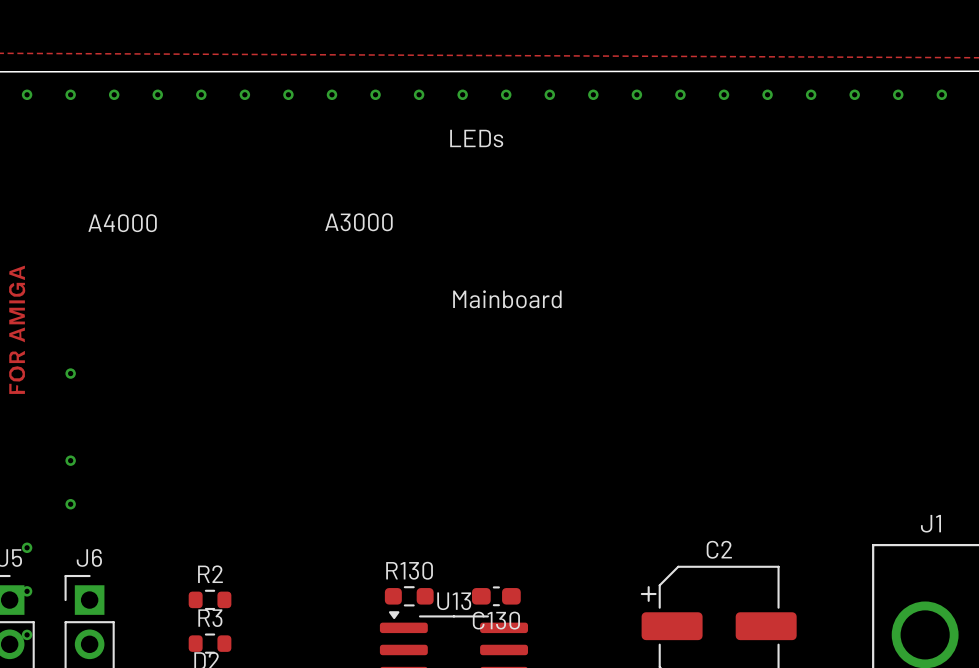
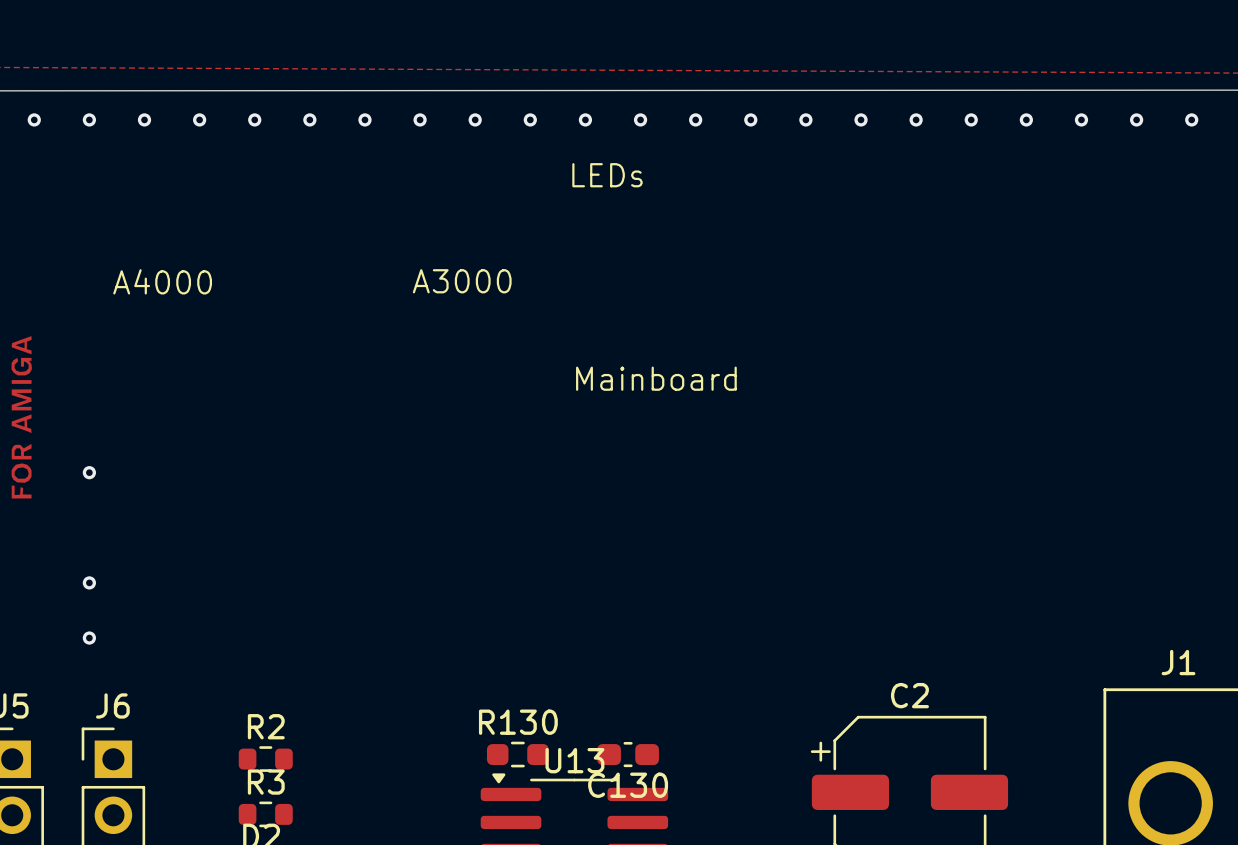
via: (27, 547) -> none
via: (27, 591) -> none
via: (27, 634) -> none

